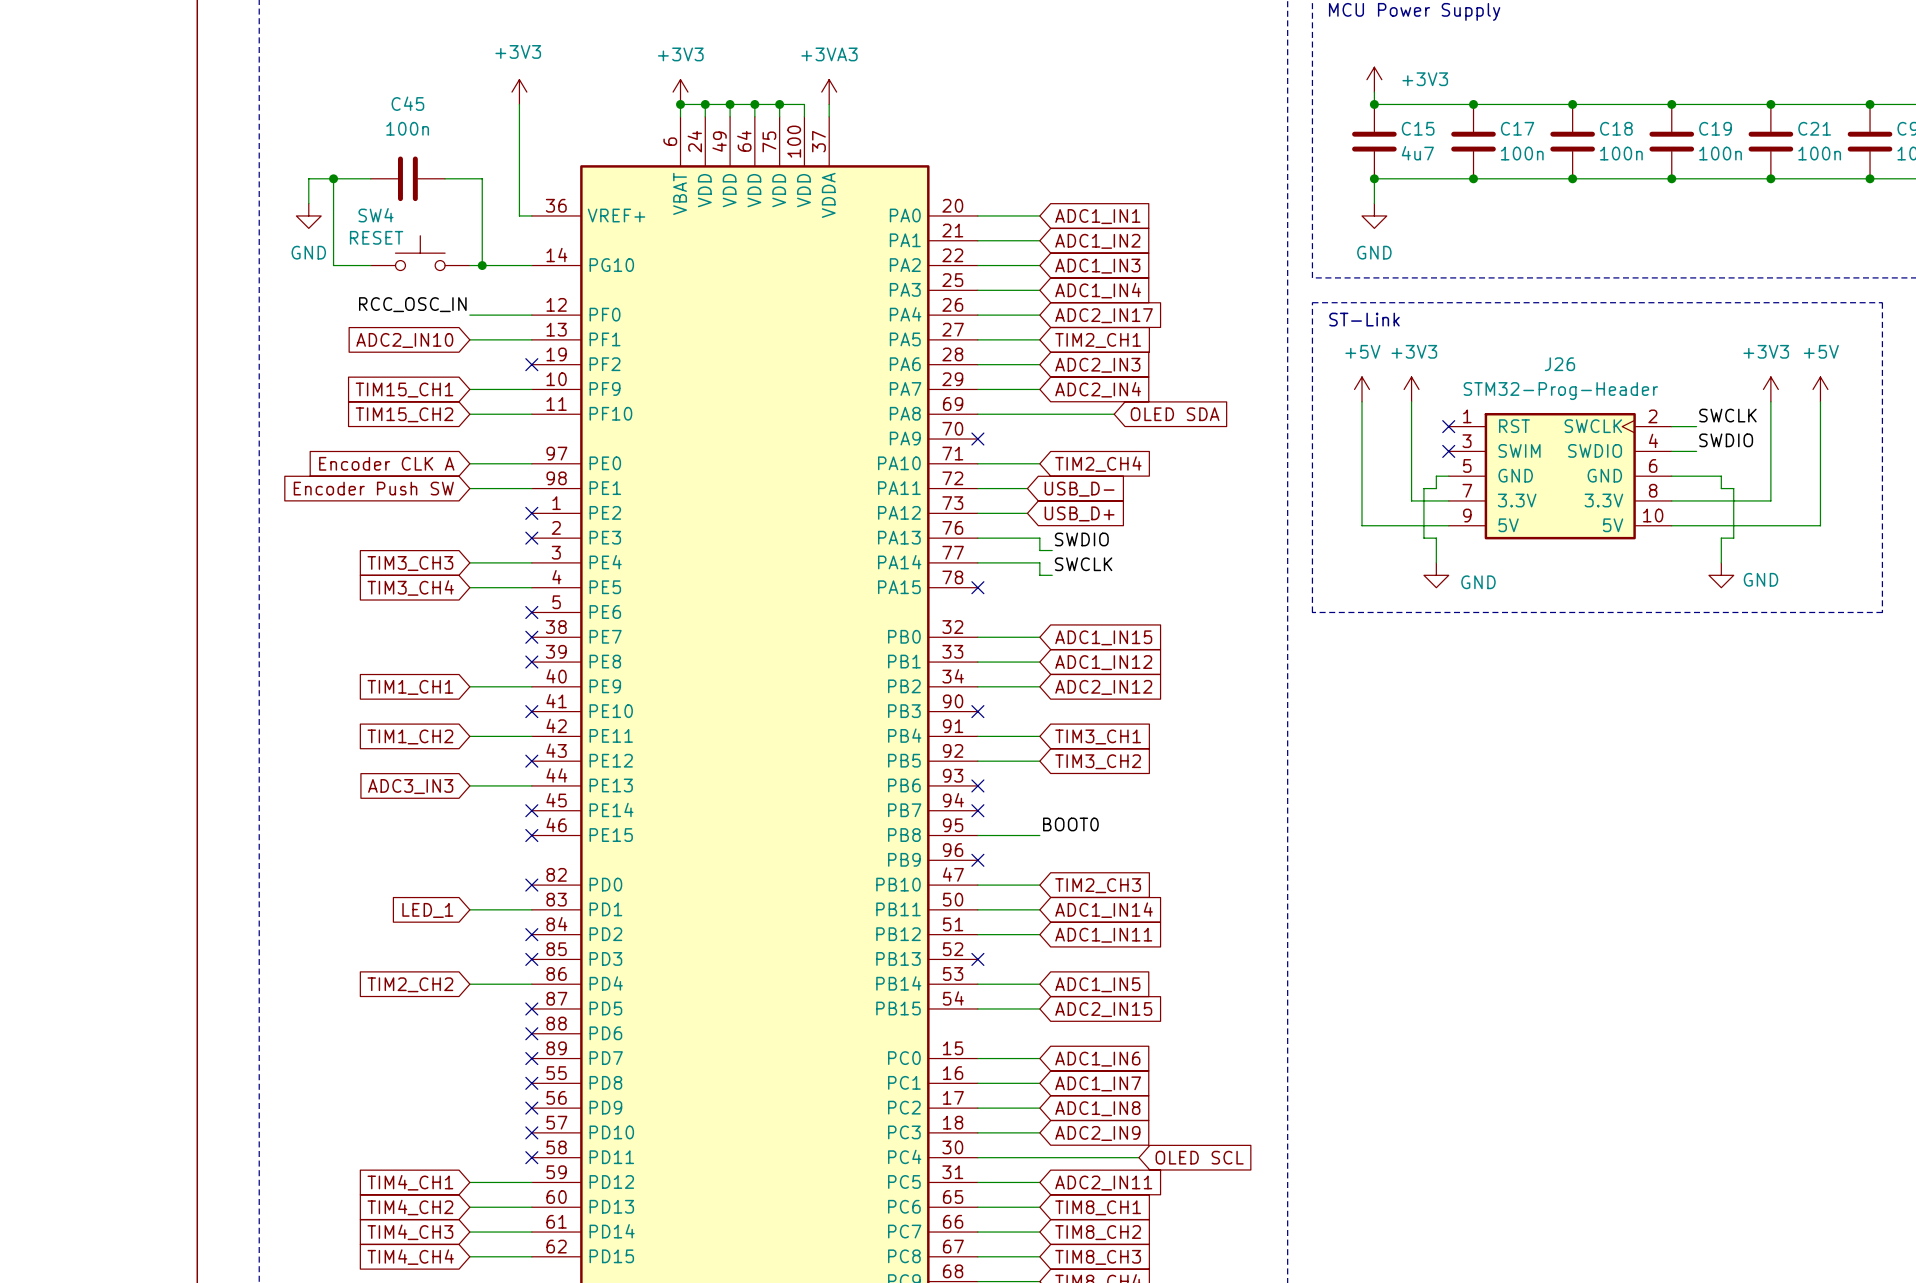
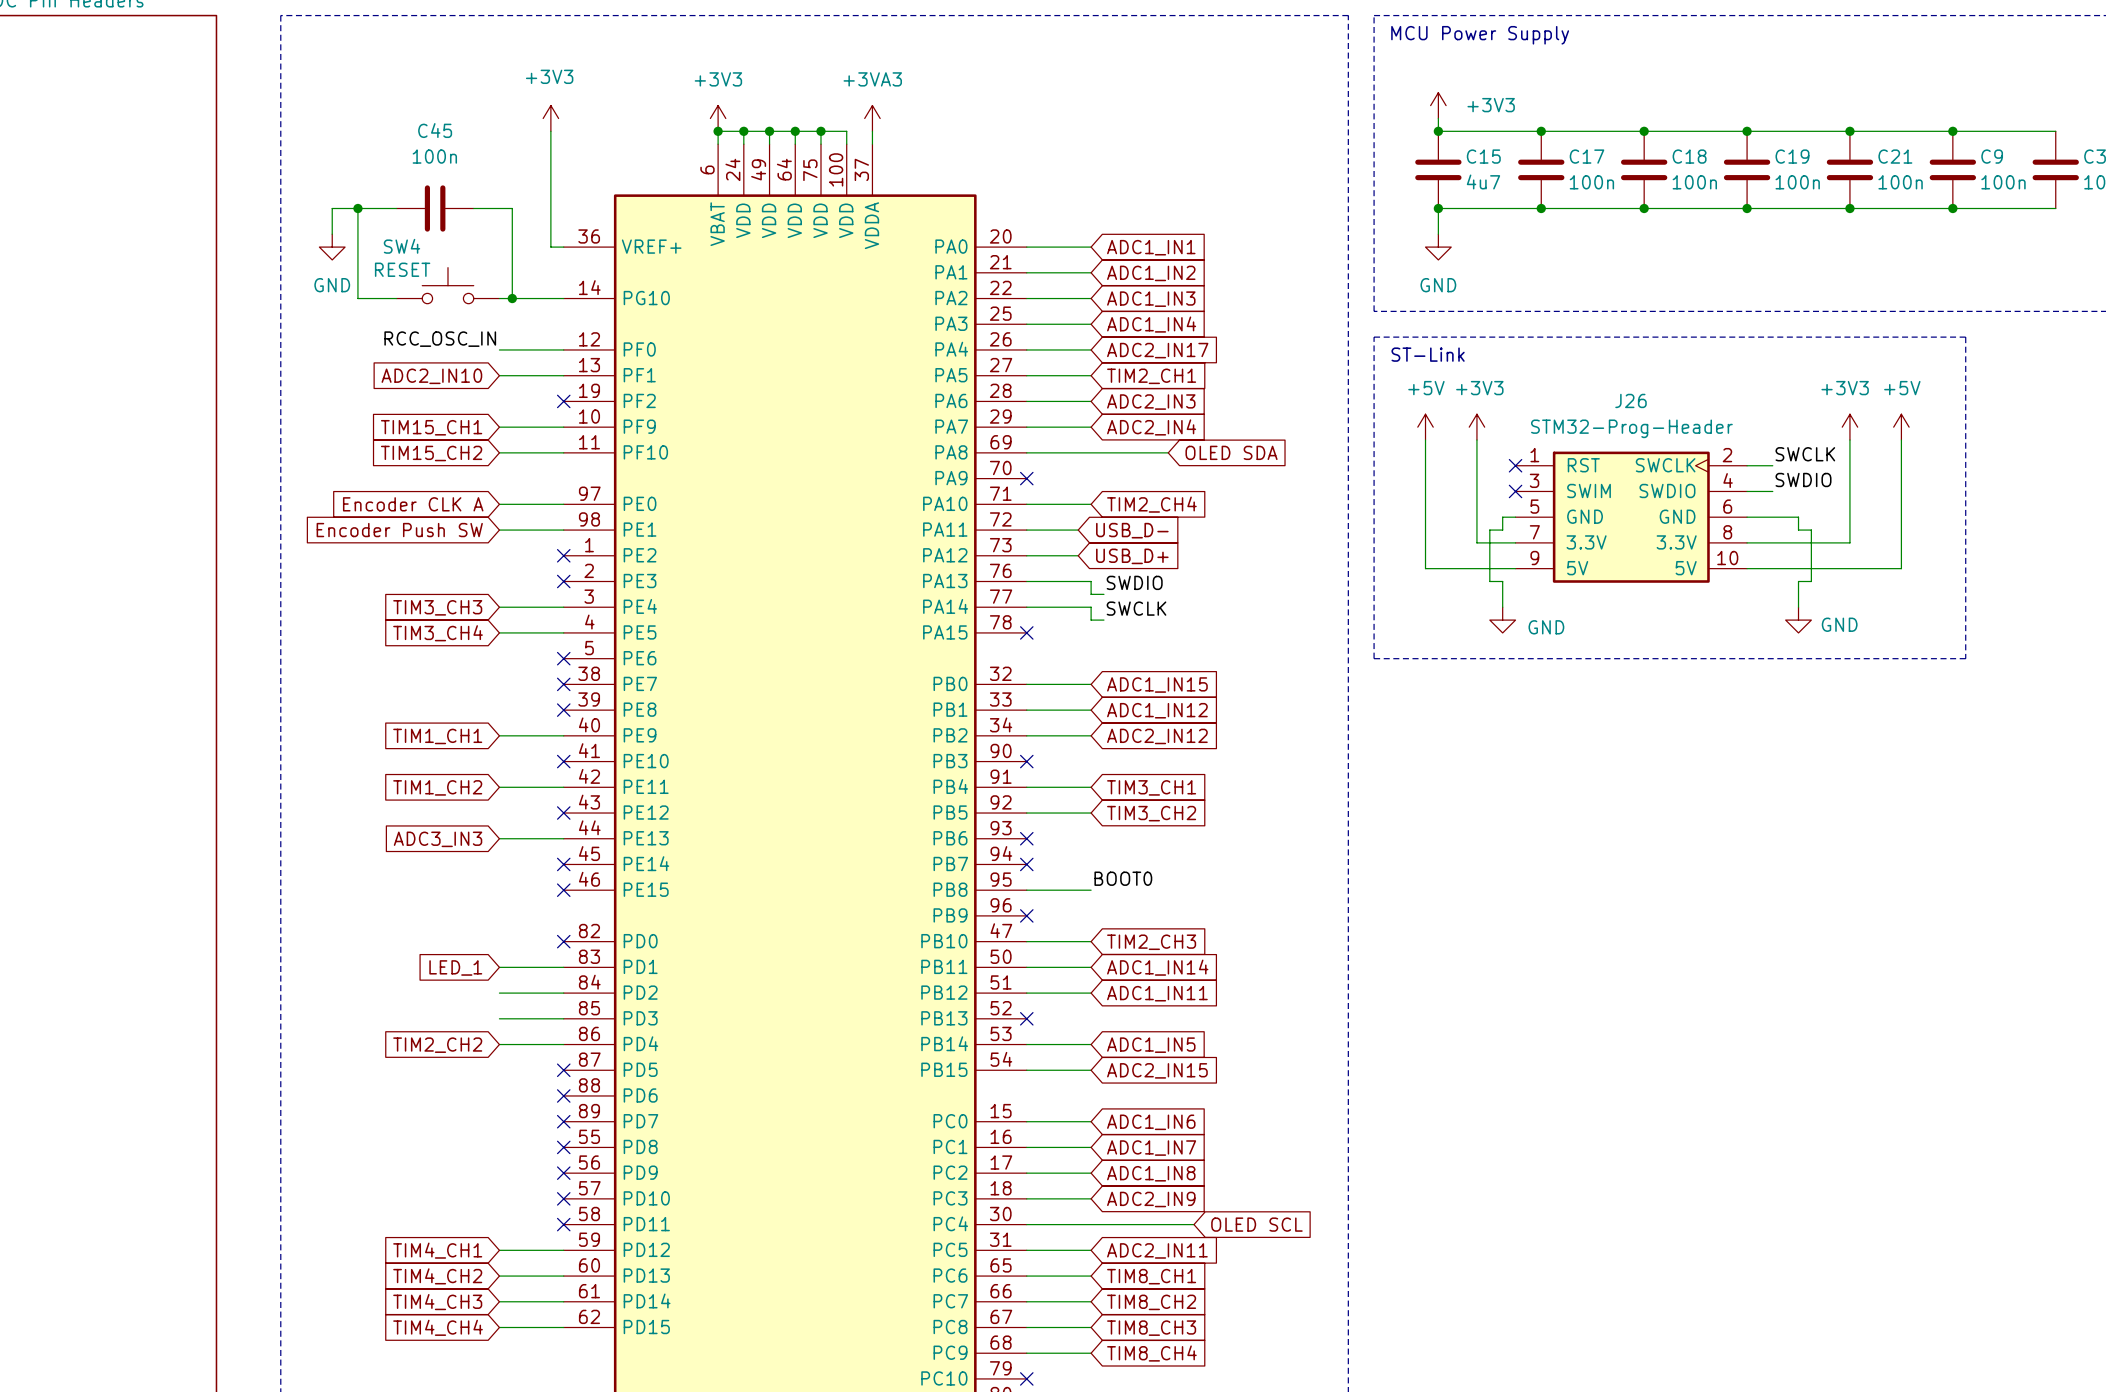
wire: none -> (499, 993) (563, 993)
no-connect mark: (531, 934) -> none
wire: none -> (499, 1018) (563, 1018)
no-connect mark: (531, 959) -> none

